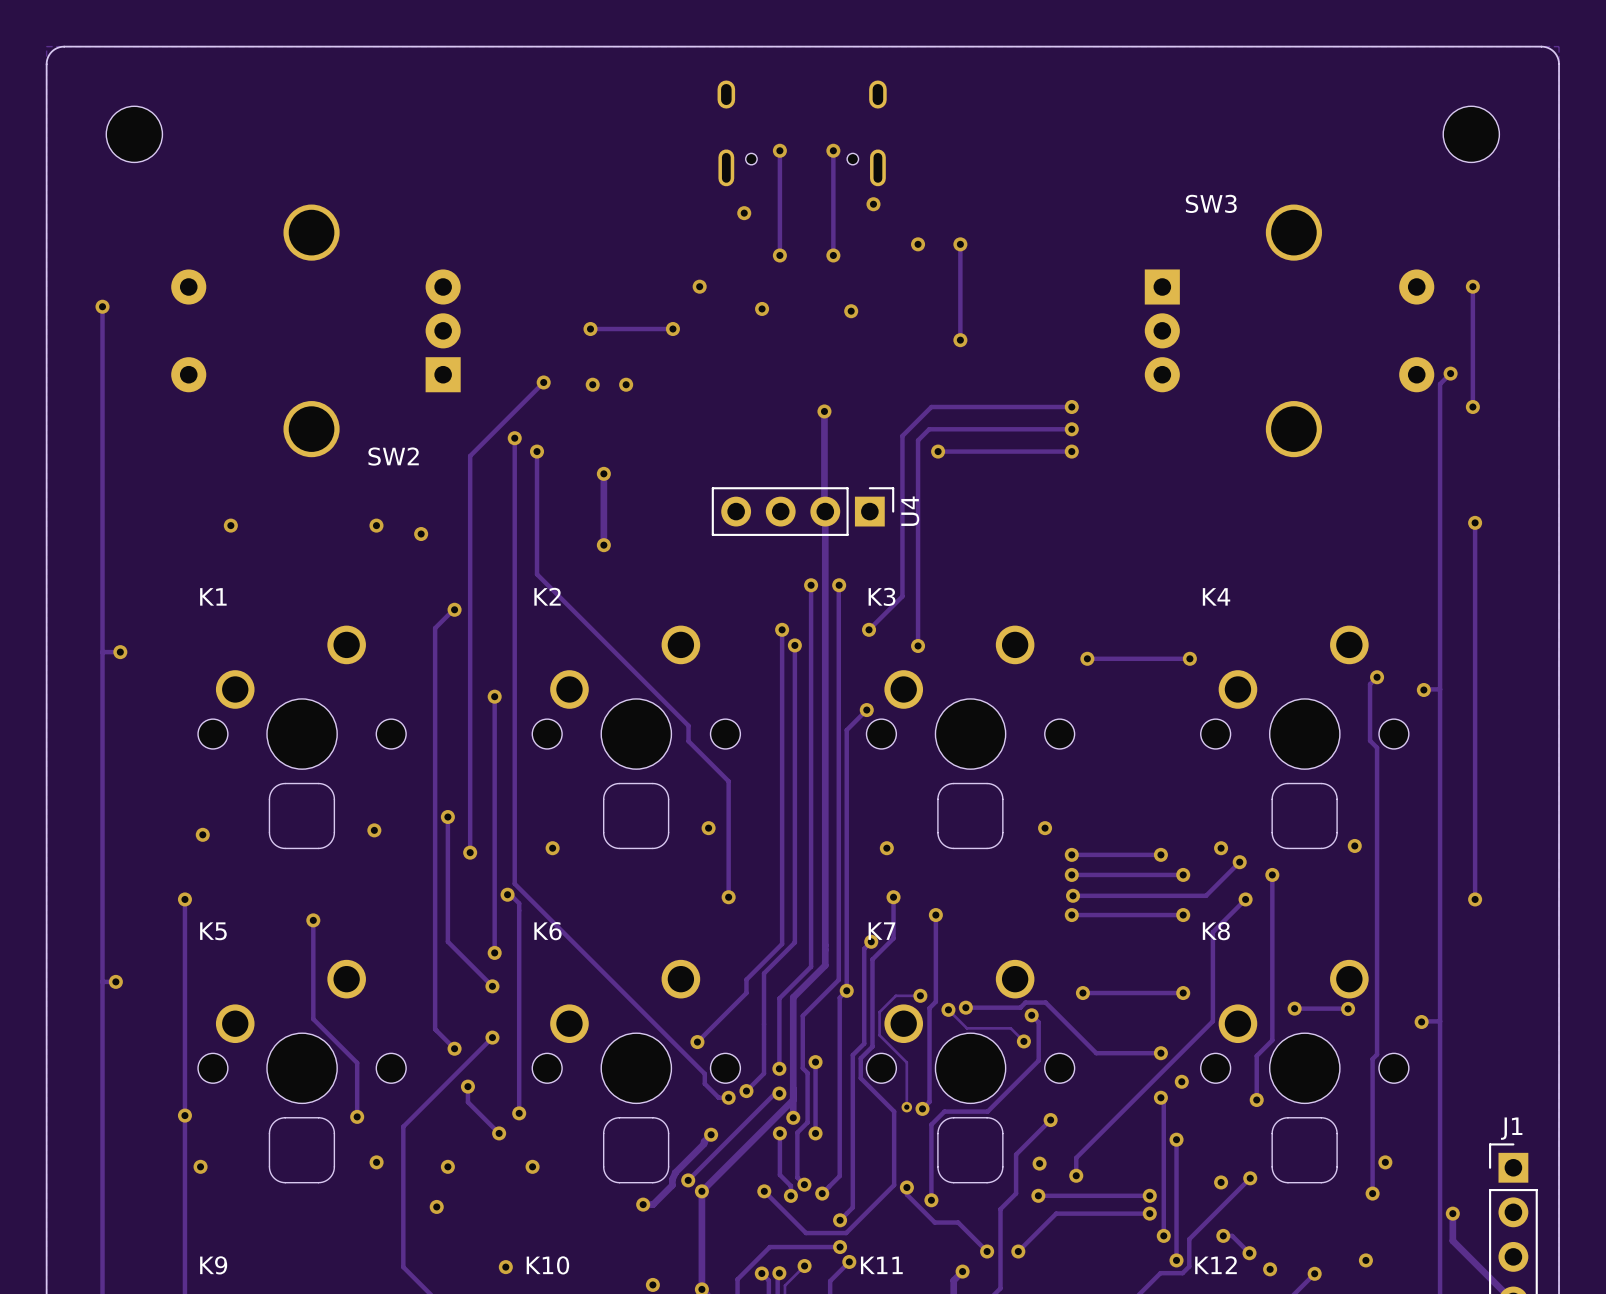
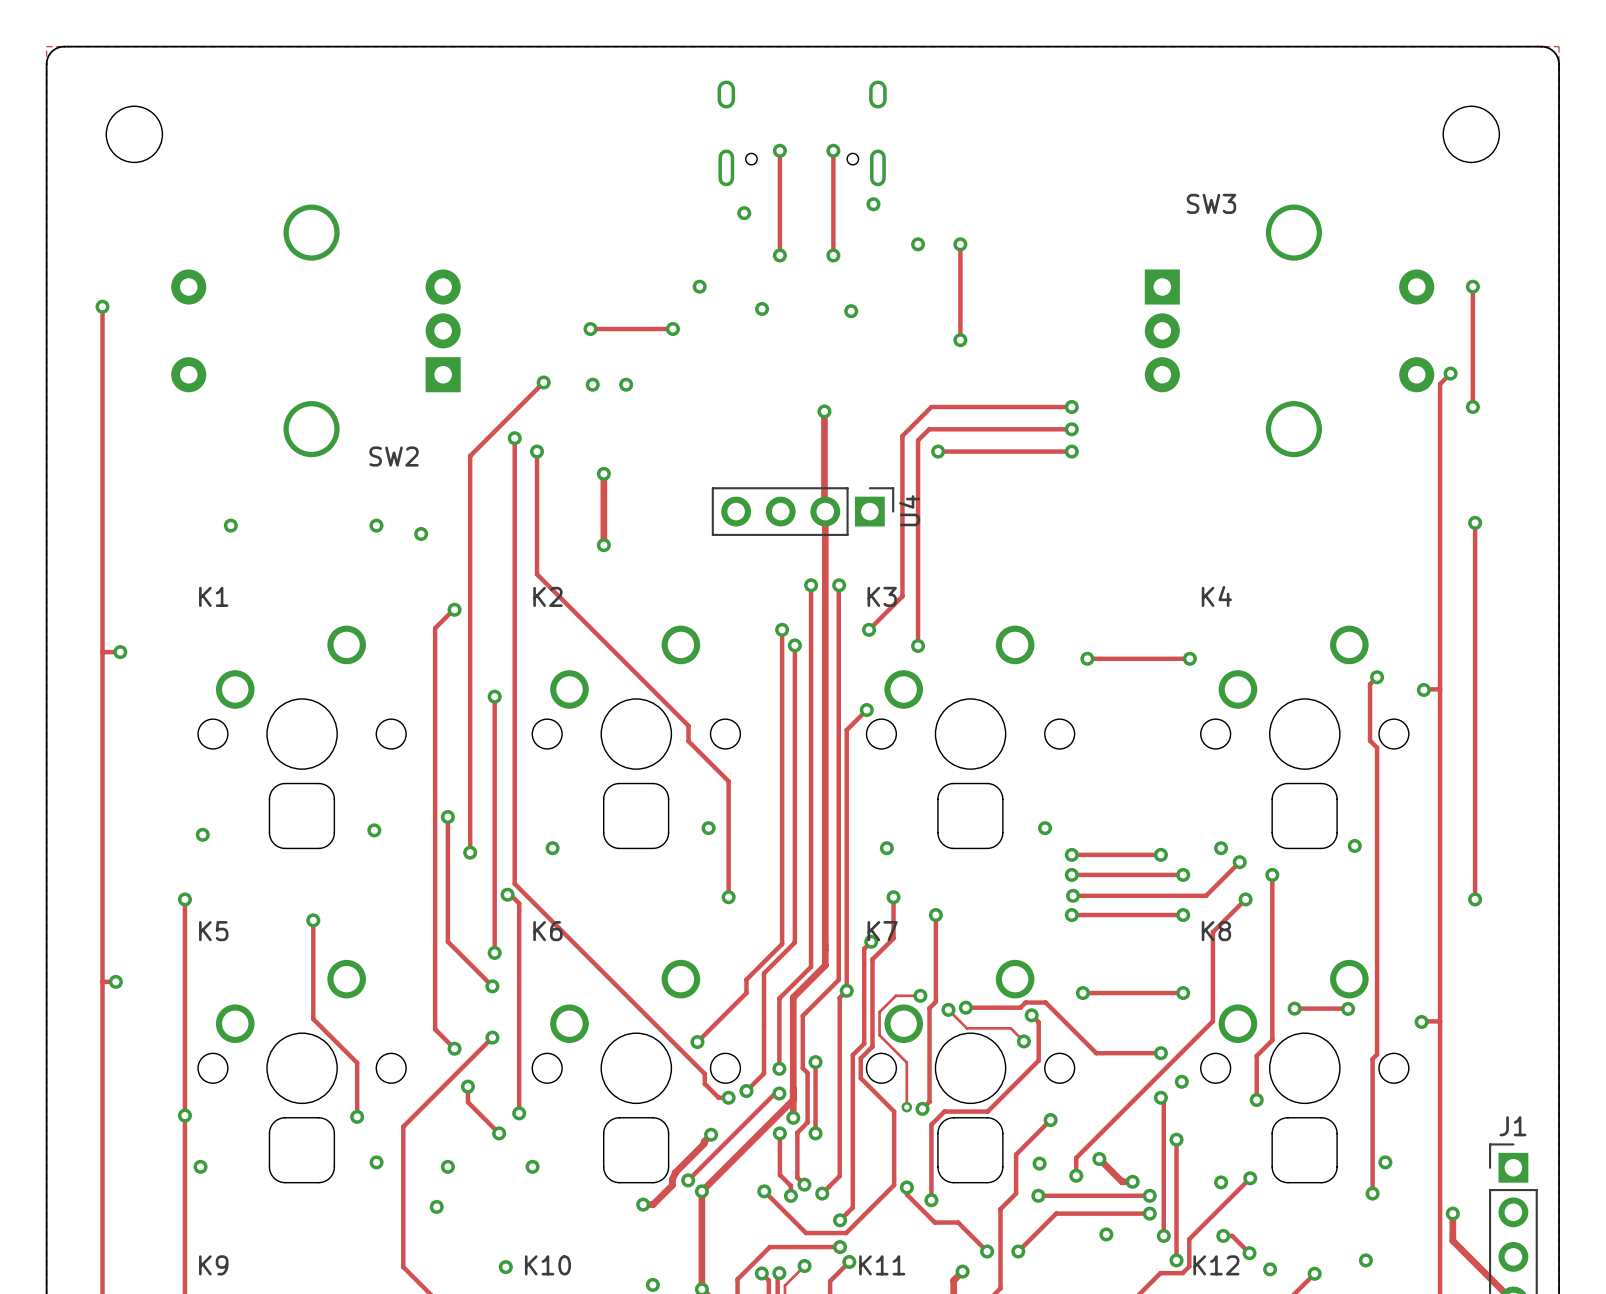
track: none -> (1099, 1158) (1122, 1181) (1132, 1181)
via: none -> (1099, 1158)
via: none -> (1132, 1181)
via: none -> (1106, 1234)

